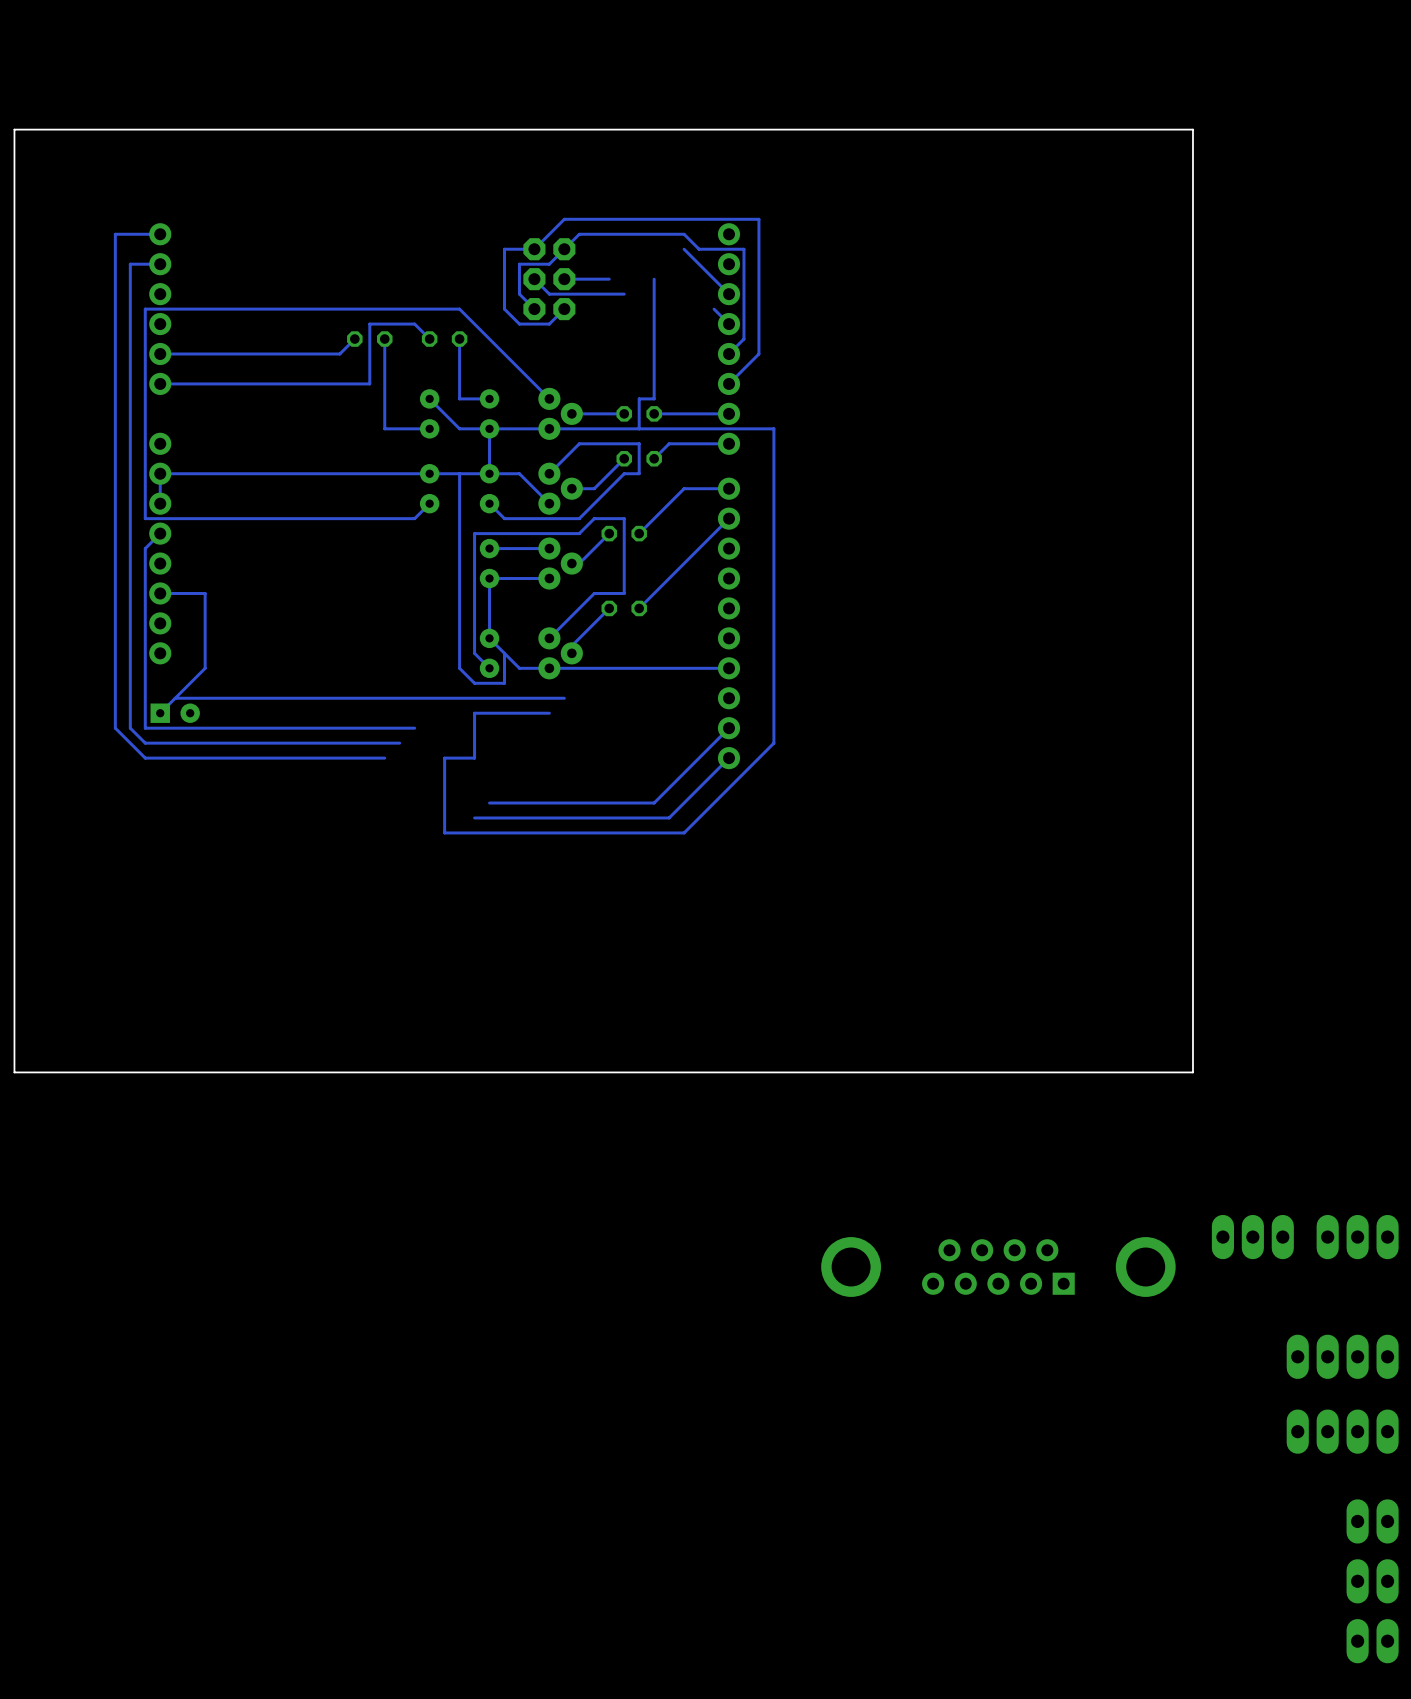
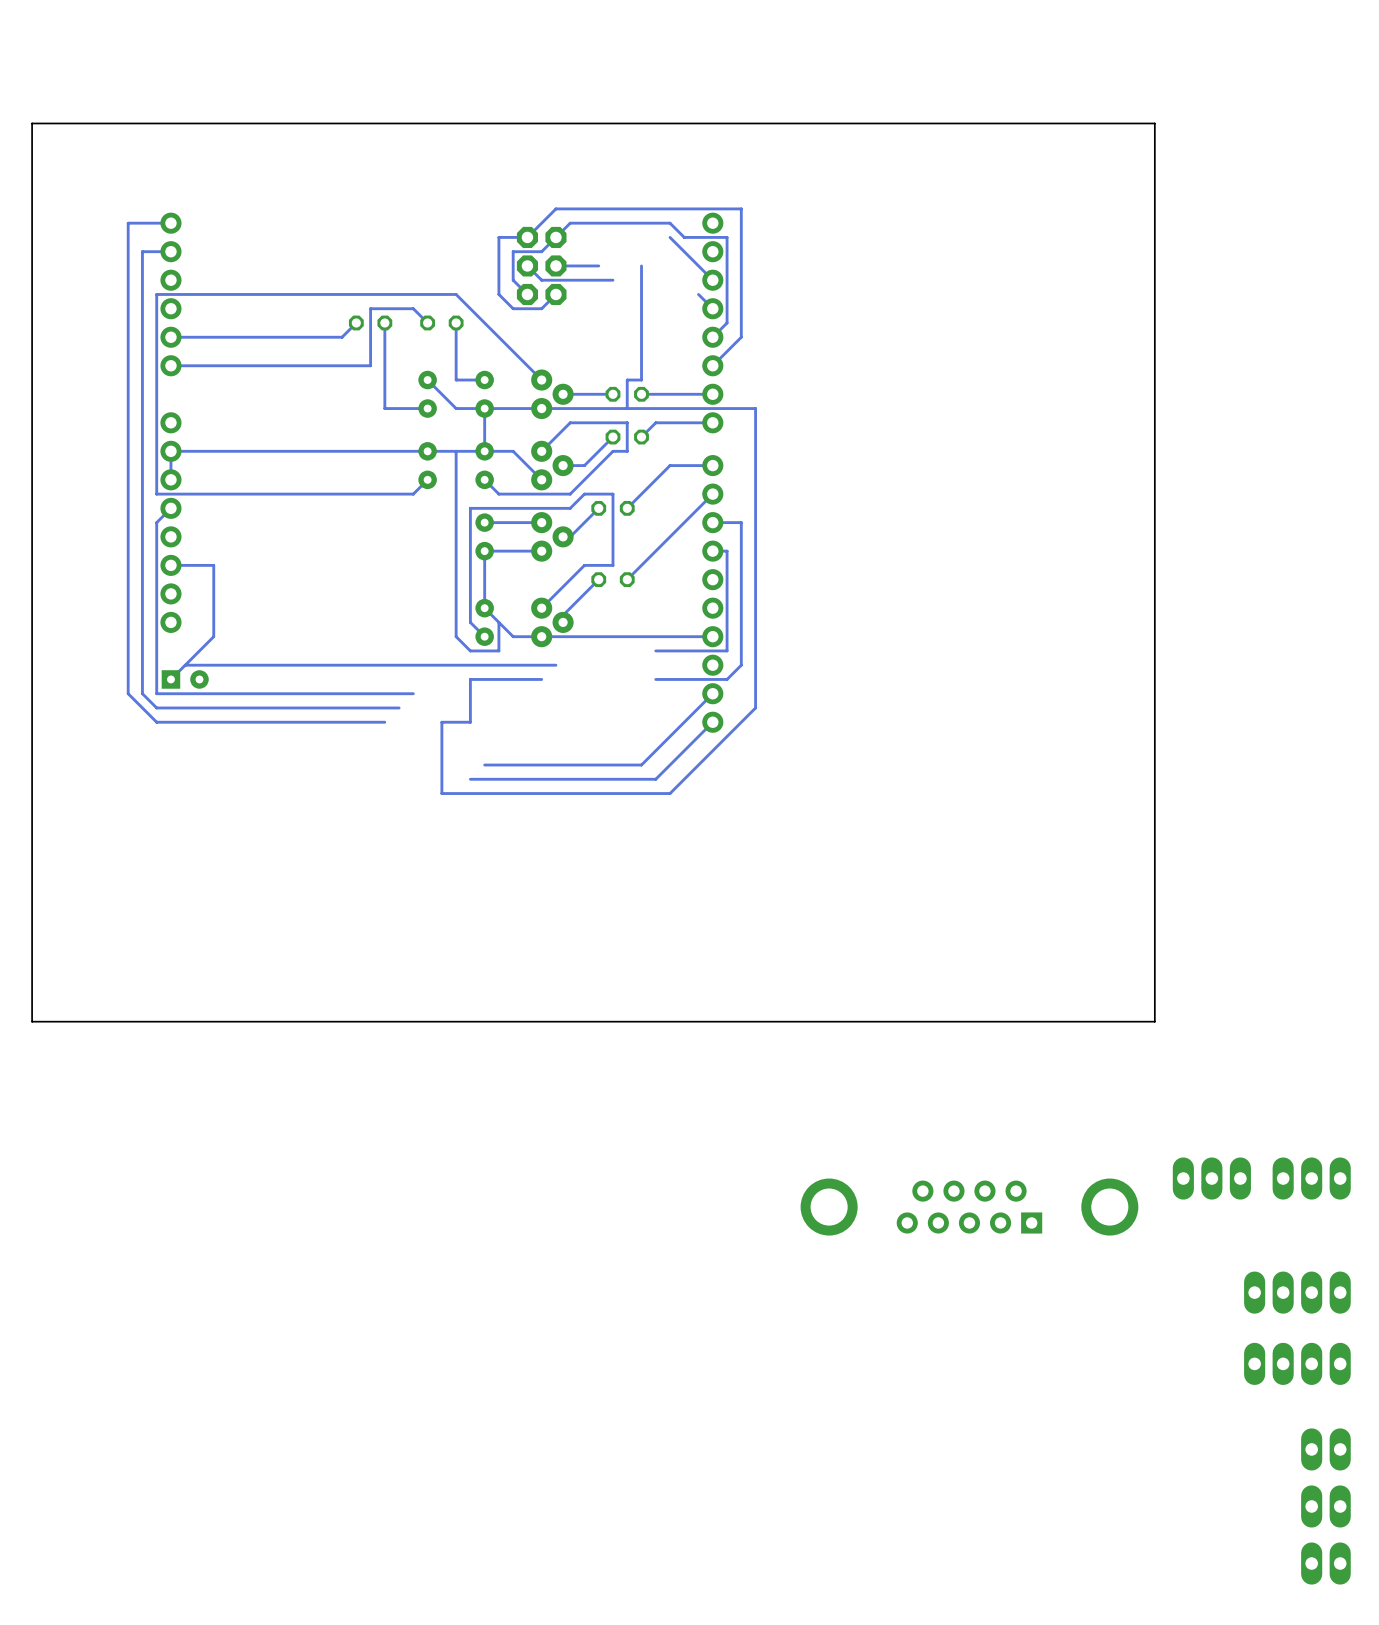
track: none -> (712, 522) (741, 522) (741, 665) (727, 679) (655, 679)
track: none -> (712, 551) (727, 551) (727, 650) (655, 650)

